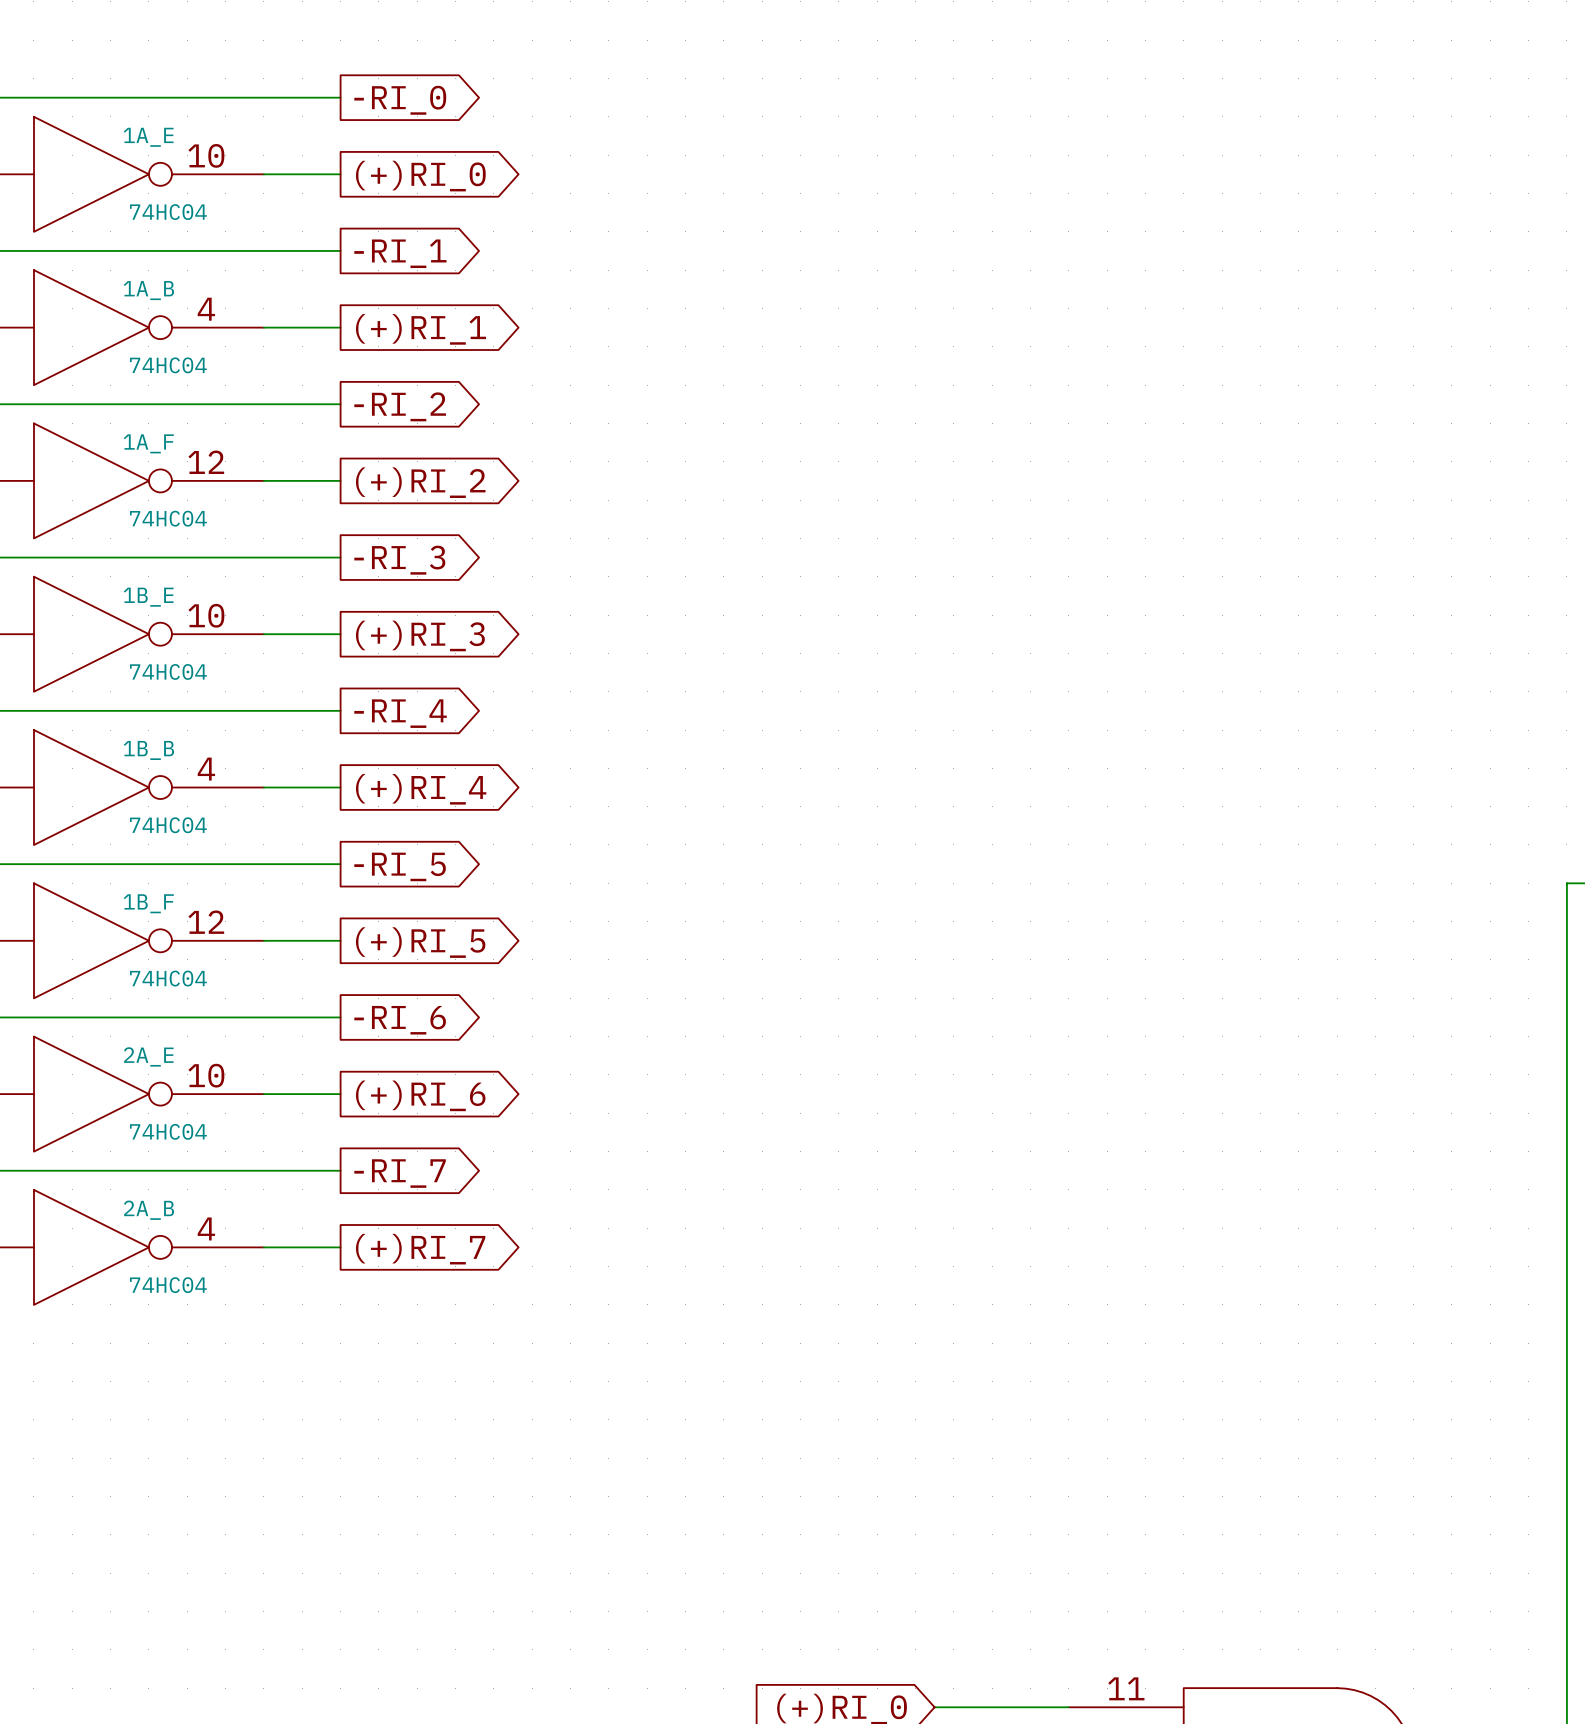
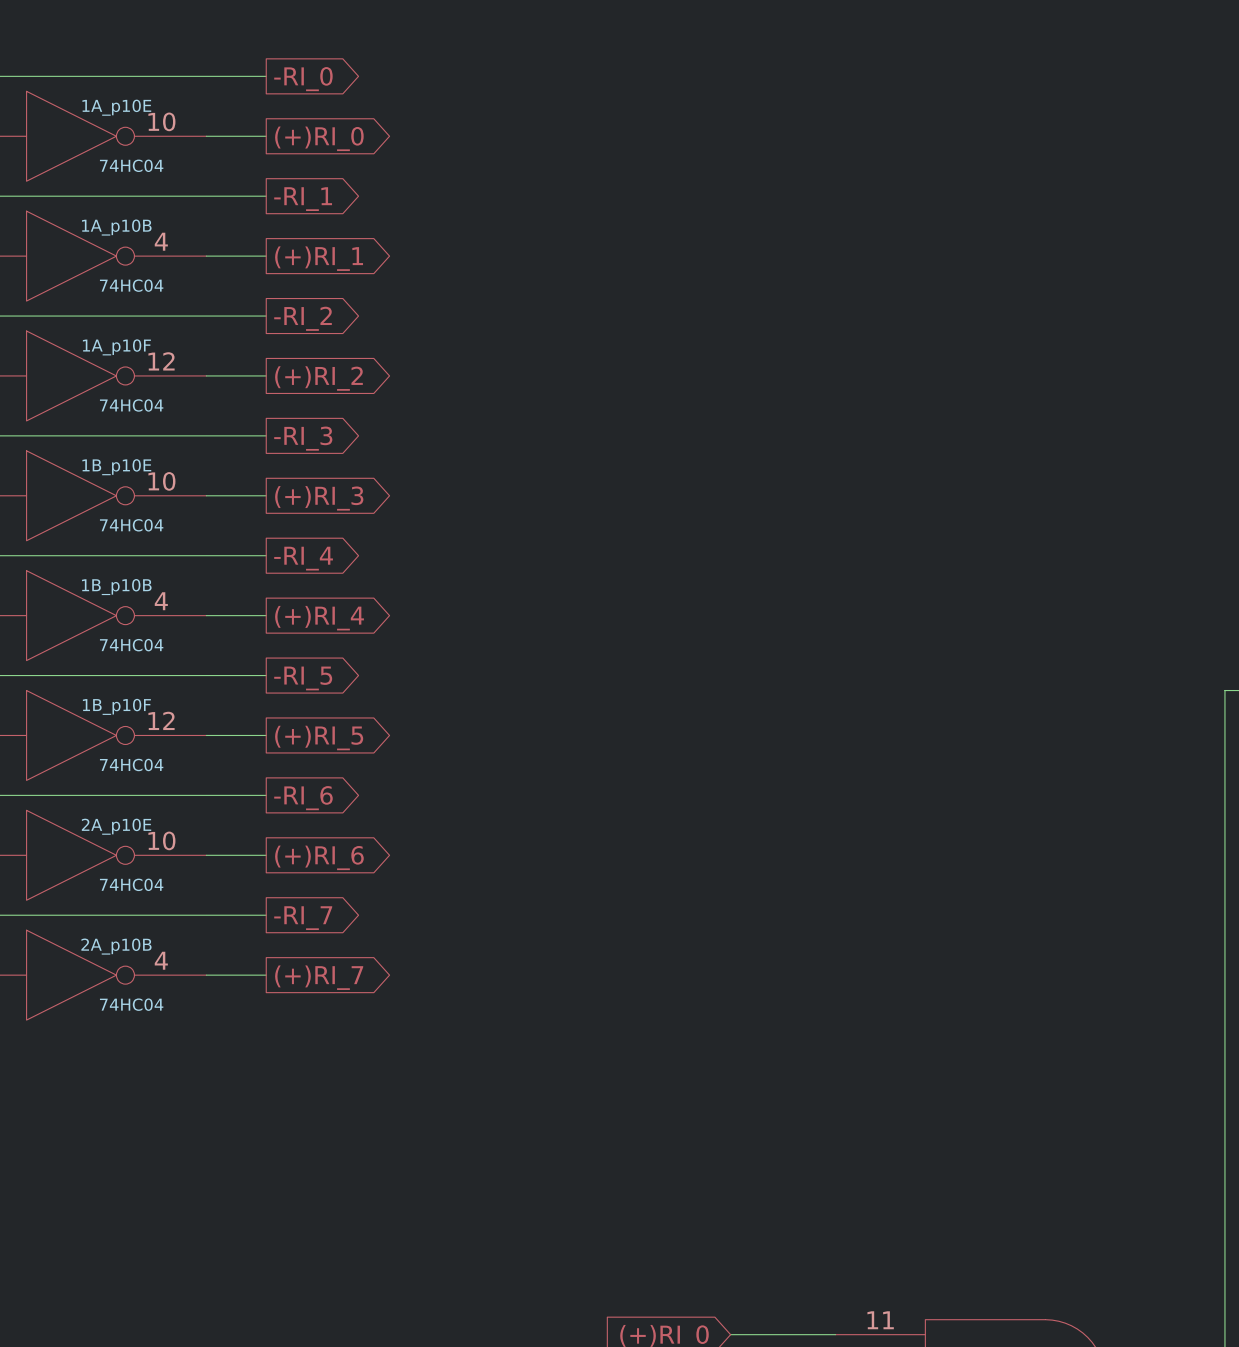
1A_E name: 1A_E (148, 137) -> 1A_p10E (116, 107)
1A_B name: 1A_B (148, 290) -> 1A_p10B (116, 227)
1A_F name: 1A_F (148, 443) -> 1A_p10F (116, 347)
1B_E name: 1B_E (148, 597) -> 1B_p10E (116, 467)
1B_B name: 1B_B (148, 750) -> 1B_p10B (116, 587)
1B_F name: 1B_F (148, 903) -> 1B_p10F (116, 706)
2A_E name: 2A_E (148, 1056) -> 2A_p10E (116, 826)
2A_B name: 2A_B (149, 1210) -> 2A_p10B (116, 946)

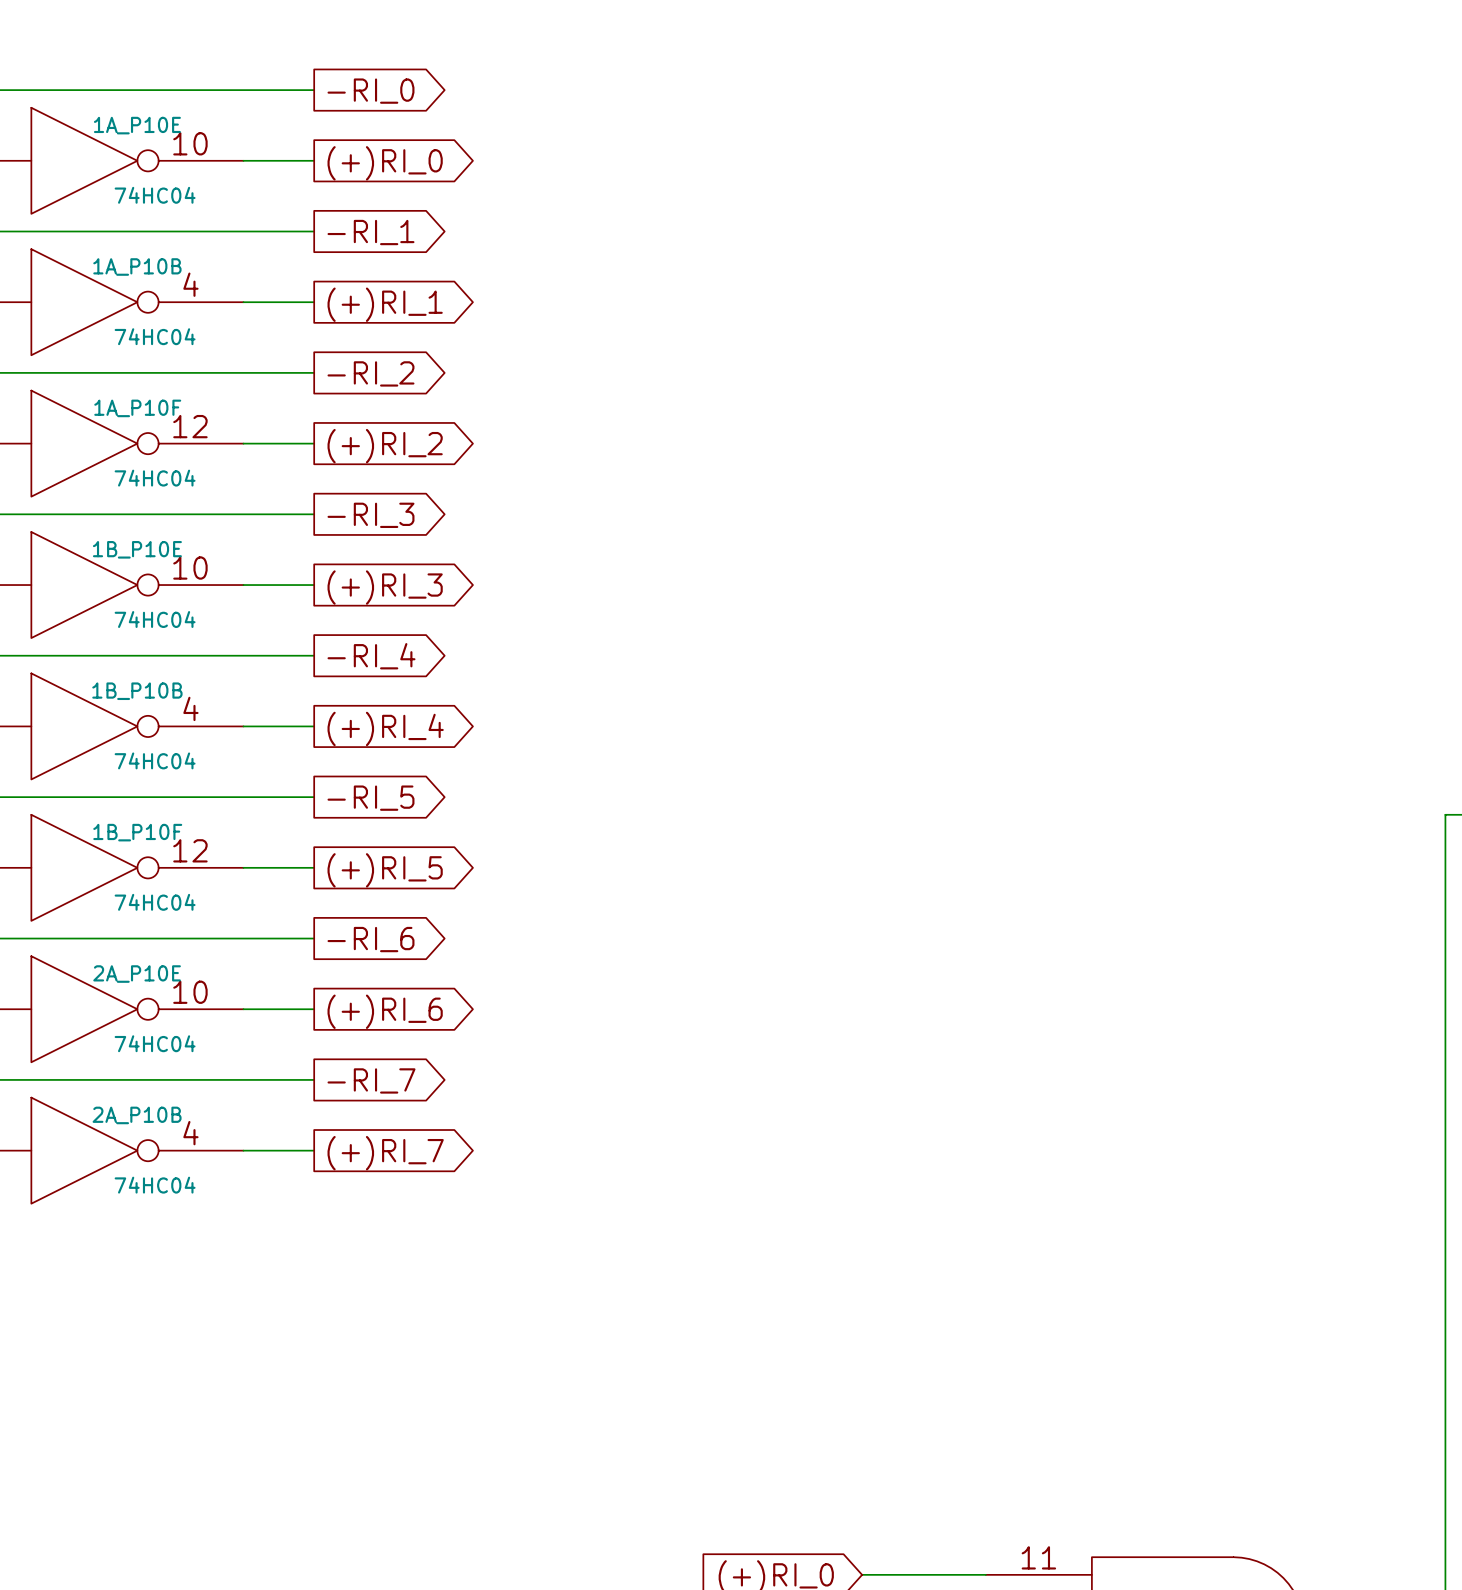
1A_p10E name: 1A_p10E (116, 107) -> 1A_P10E (137, 125)
1A_p10B name: 1A_p10B (116, 227) -> 1A_P10B (137, 267)
1A_p10F name: 1A_p10F (116, 347) -> 1A_P10F (137, 408)
1B_p10E name: 1B_p10E (116, 467) -> 1B_P10E (137, 549)
1B_p10B name: 1B_p10B (116, 587) -> 1B_P10B (137, 691)
1B_p10F name: 1B_p10F (116, 706) -> 1B_P10F (137, 832)
2A_p10E name: 2A_p10E (116, 826) -> 2A_P10E (137, 974)
2A_p10B name: 2A_p10B (116, 946) -> 2A_P10B (137, 1115)

